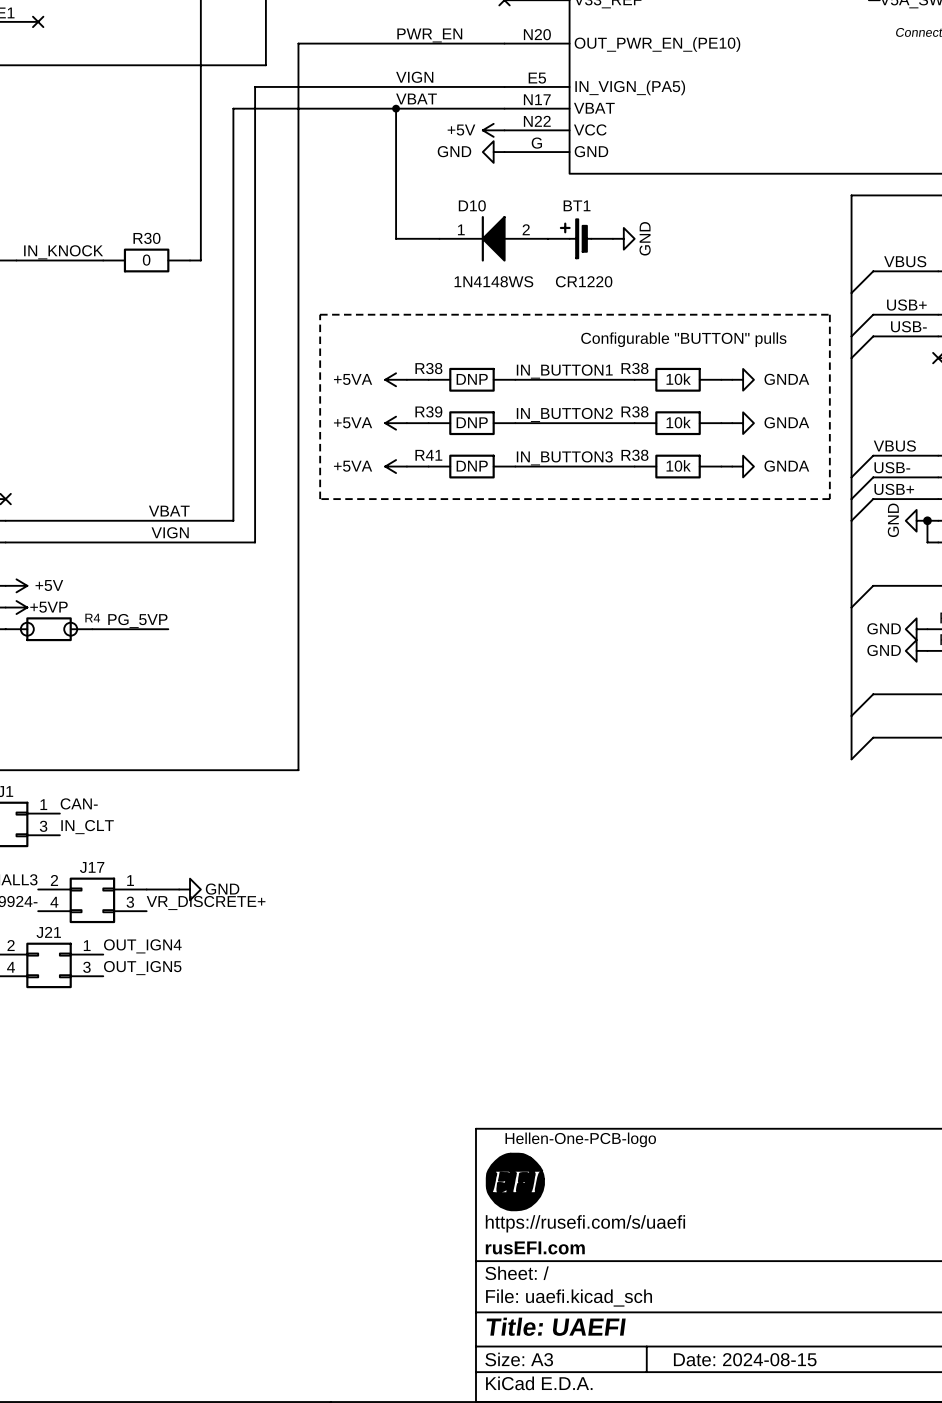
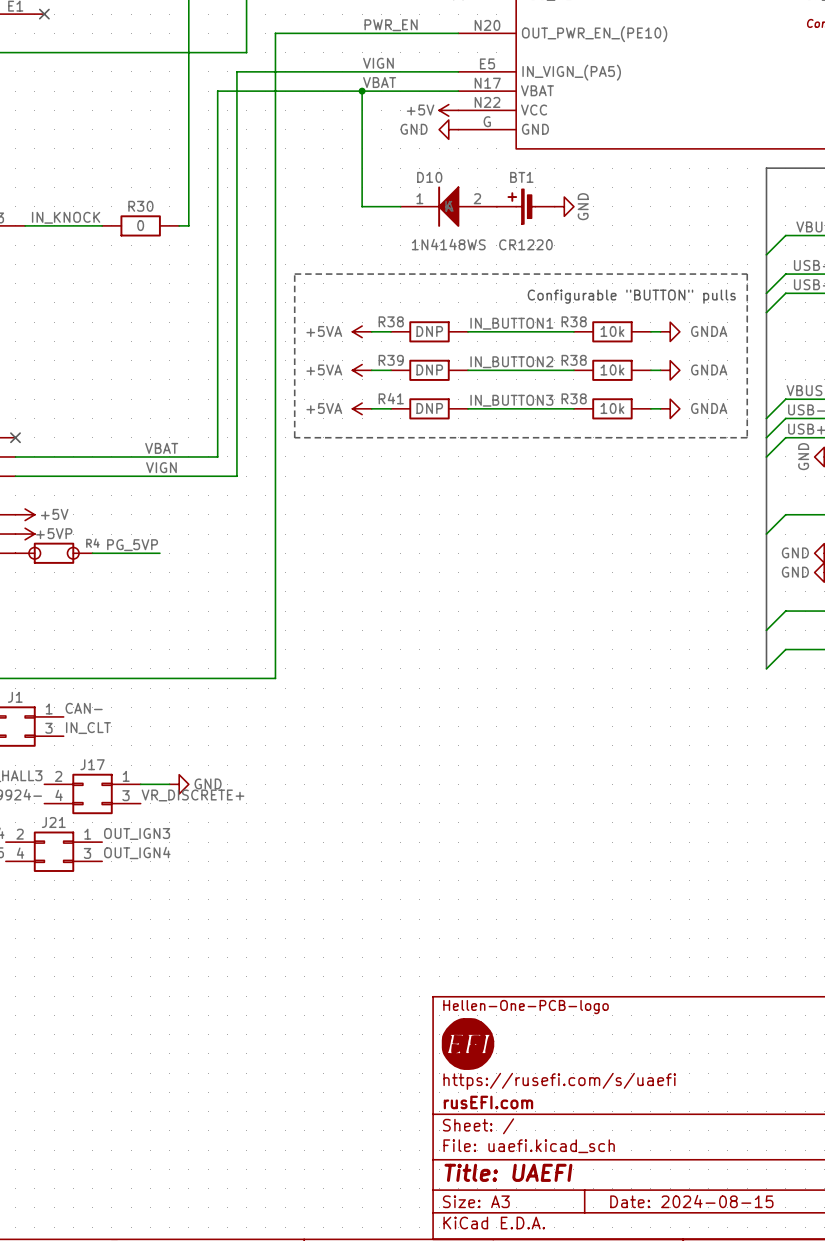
label: OUT_IGN4 (142, 946) -> OUT_IGN3 (137, 833)
label: OUT_IGN5 (142, 968) -> OUT_IGN4 (137, 853)

